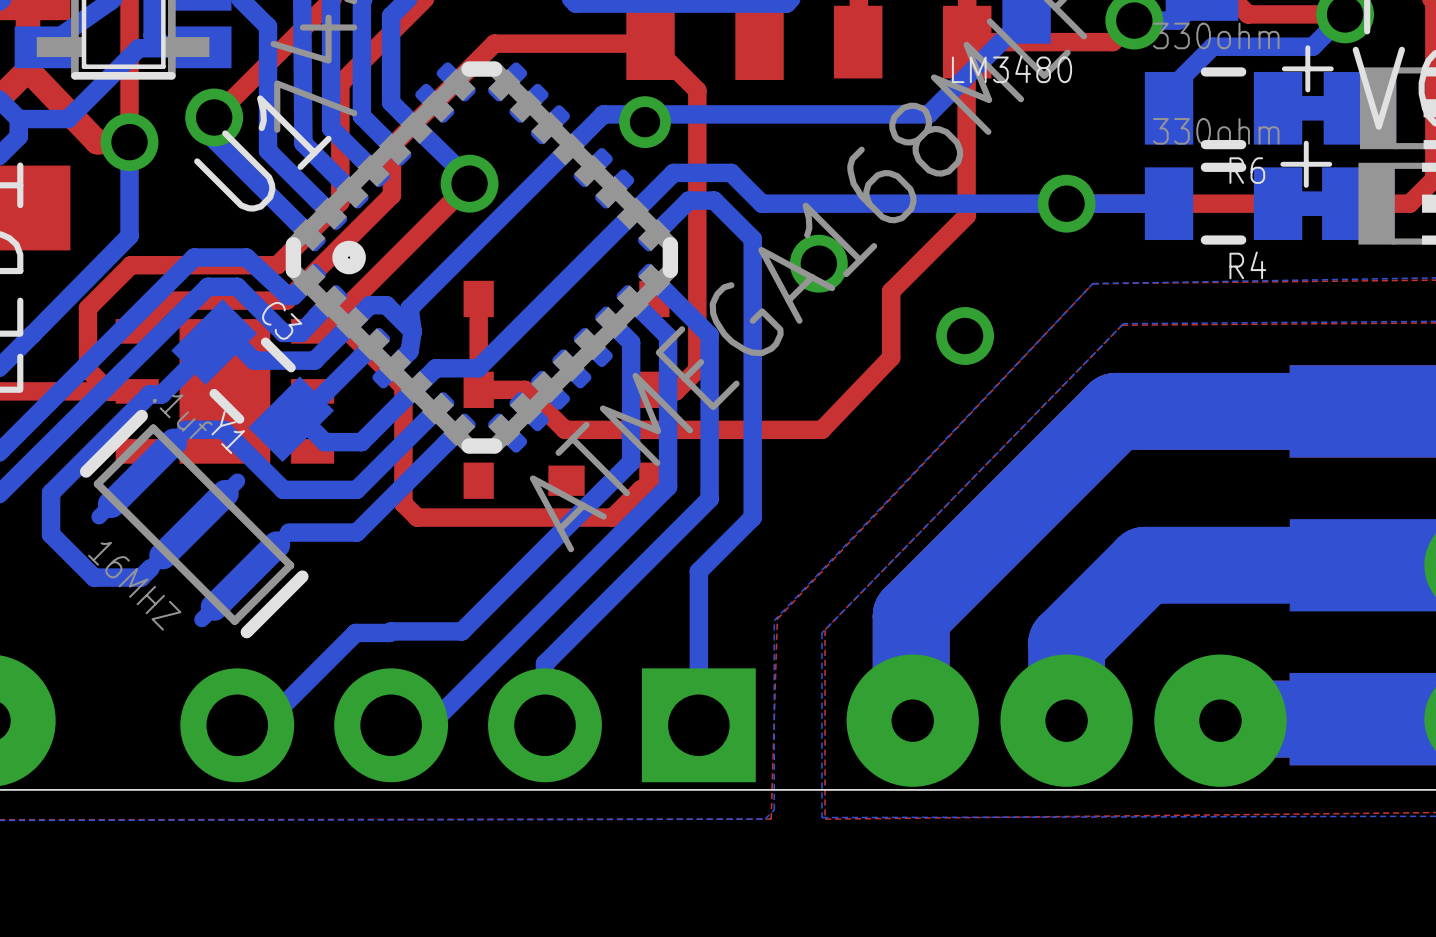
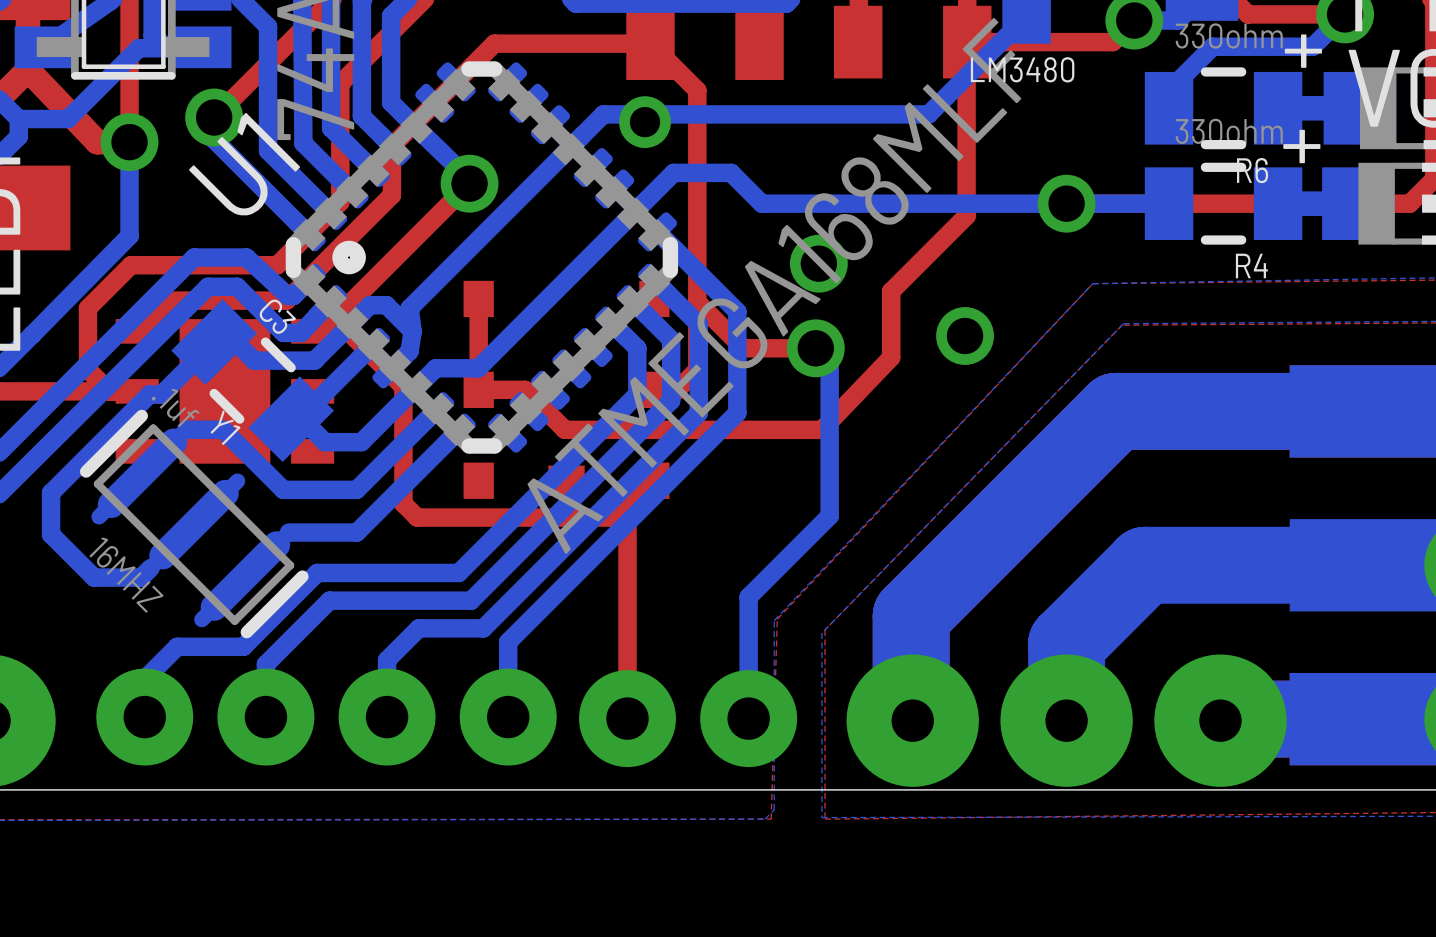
bottom track: (657, 231) (688, 200) (714, 200) (752, 239) (752, 517) (698, 571) (698, 725) -> (657, 231) (737, 311) (737, 412) (508, 642) (508, 717)
top track: none -> (697, 302) (743, 348) (815, 348)
bottom track: (698, 324) (709, 335) (709, 499) (544, 663) (544, 725) -> (698, 324) (698, 412) (483, 628) (418, 628) (387, 660) (387, 717)
bottom track: (668, 336) (668, 486) (429, 725) (391, 725) -> (668, 336) (671, 339) (671, 400) (471, 600) (329, 600) (265, 664) (265, 717)
bottom track: (631, 342) (631, 462) (461, 631) (355, 632) (263, 725) (237, 725) -> (631, 342) (637, 348) (637, 394) (458, 572) (317, 572) (243, 646) (177, 646) (144, 679) (144, 717)
bottom track: none -> (815, 348) (829, 362) (829, 516) (748, 597) (748, 718)
via: none -> (815, 348)
top track: none -> (625, 504) (627, 506) (627, 718)
part: none -> (326, 717)
part: none -> (688, 718)
part: (468, 725) -> none

